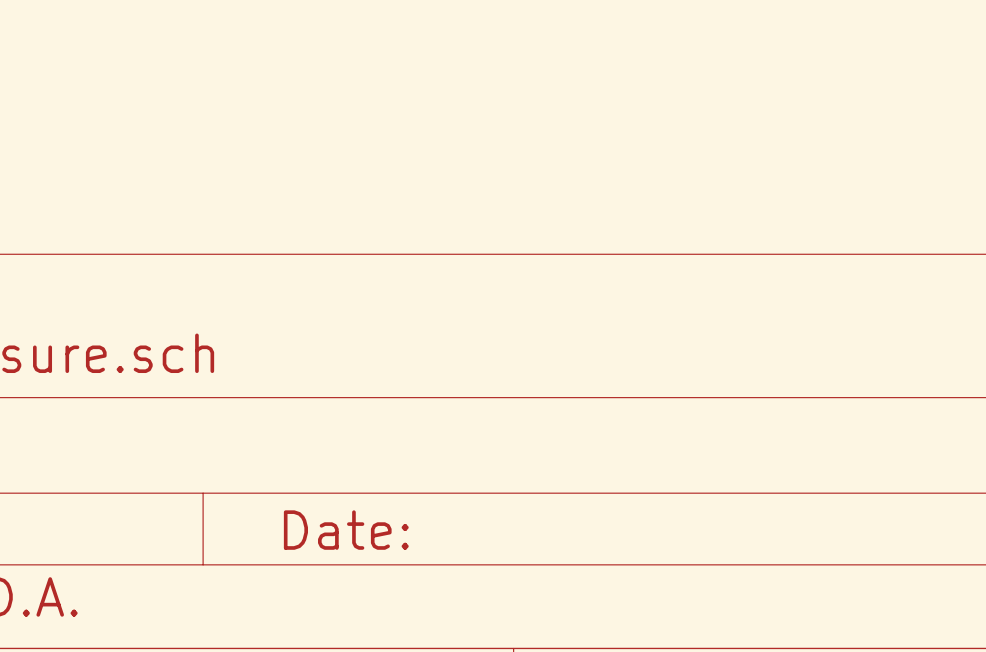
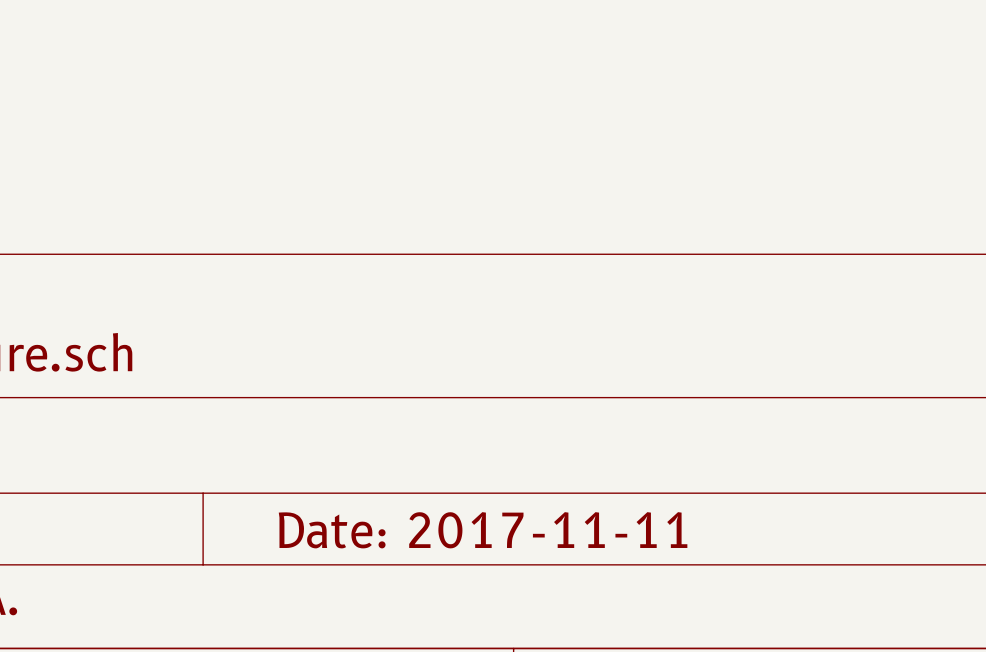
title block: Date: (346, 530) -> Date: 2017-11-11 (483, 530)

